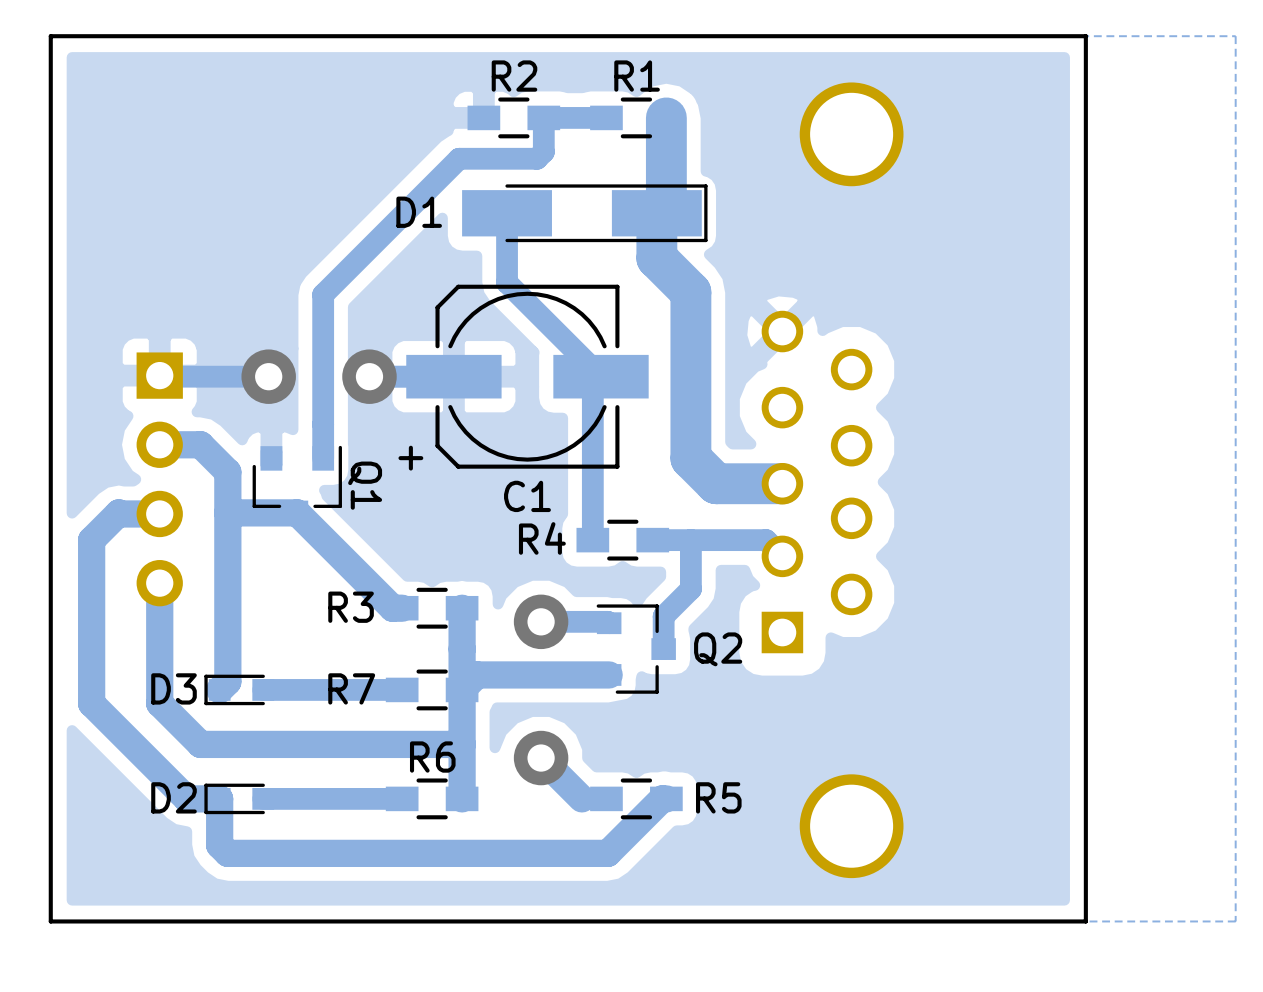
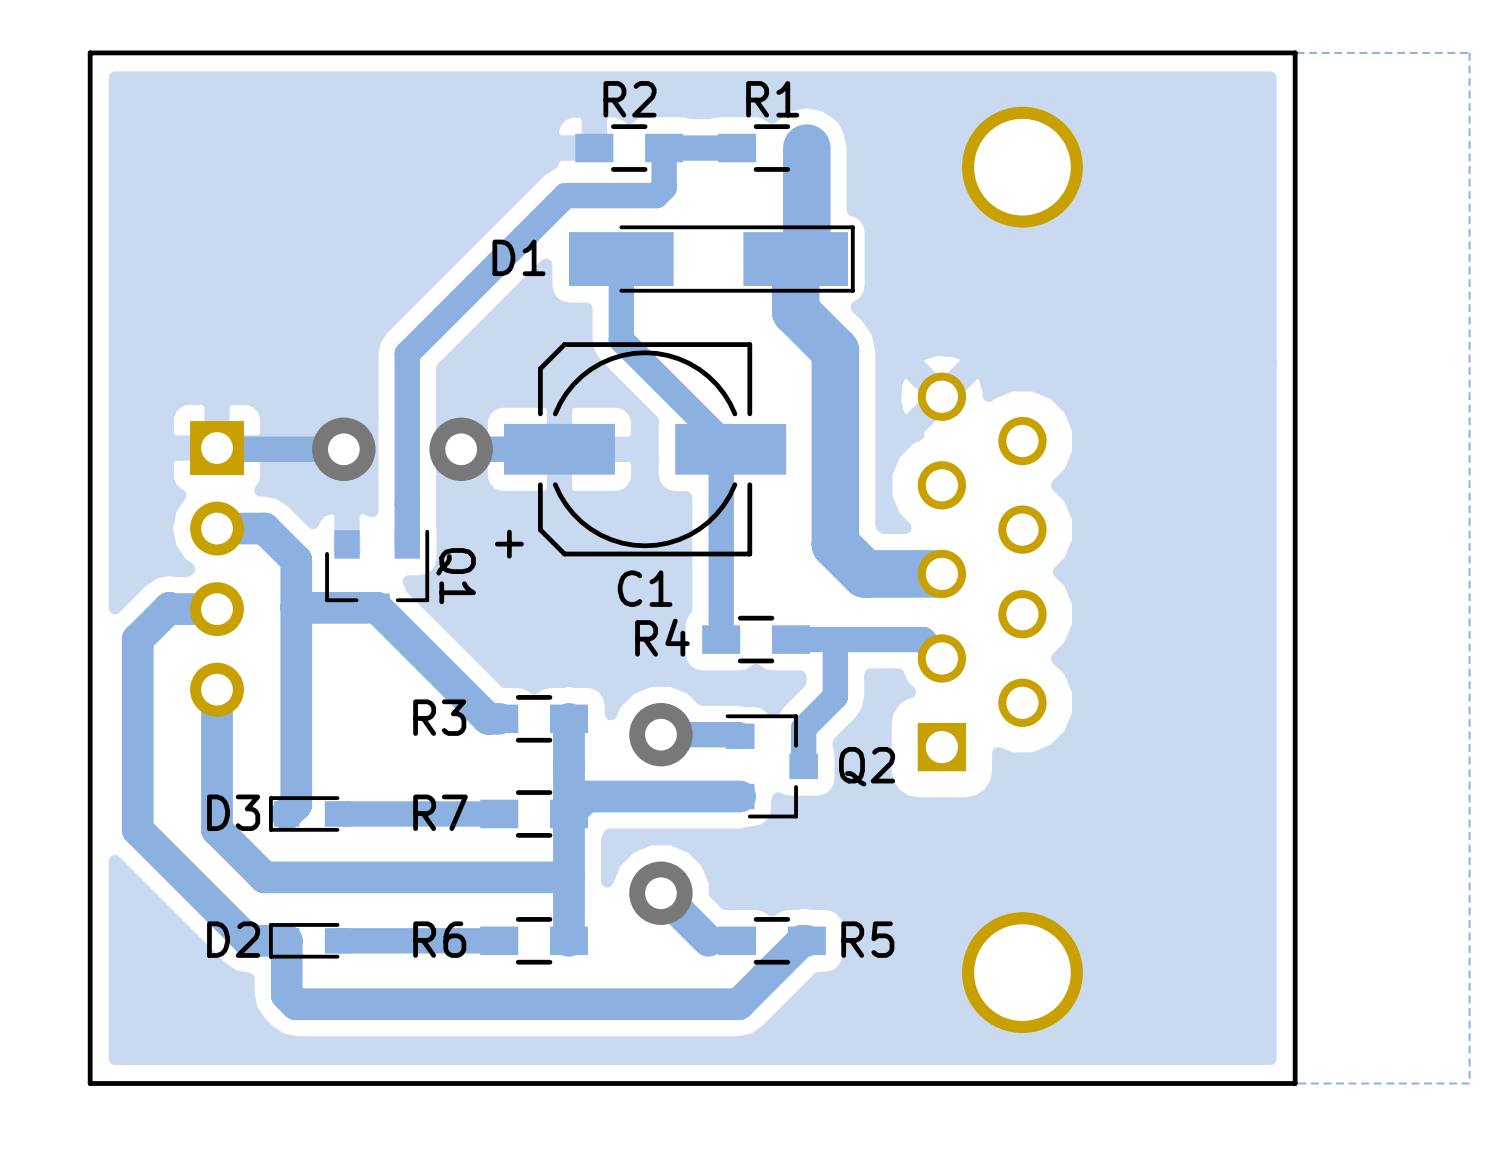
R6 name position: R6 (432, 757) -> R6 (439, 939)

